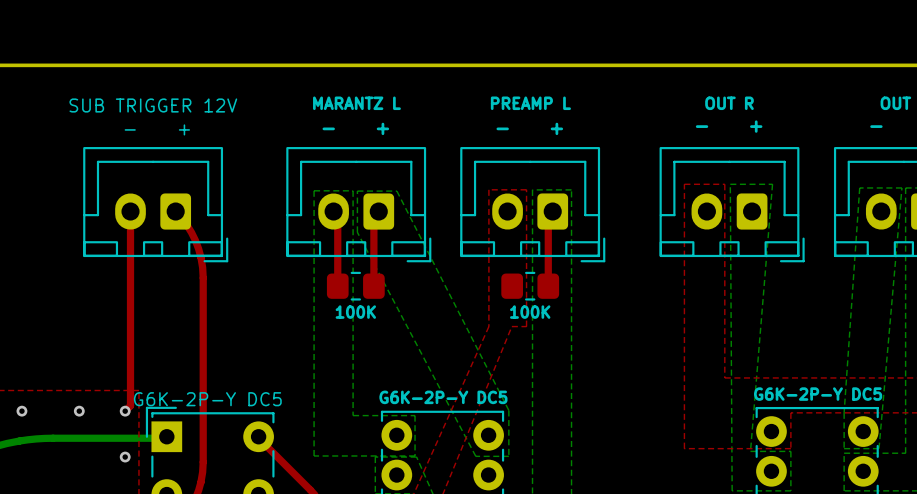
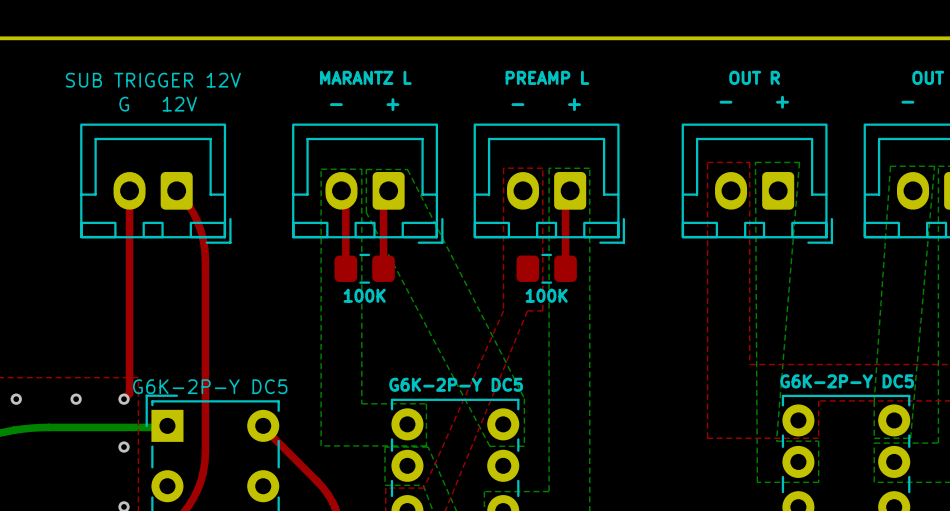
text: - + (157, 129) -> G 12V (158, 104)

